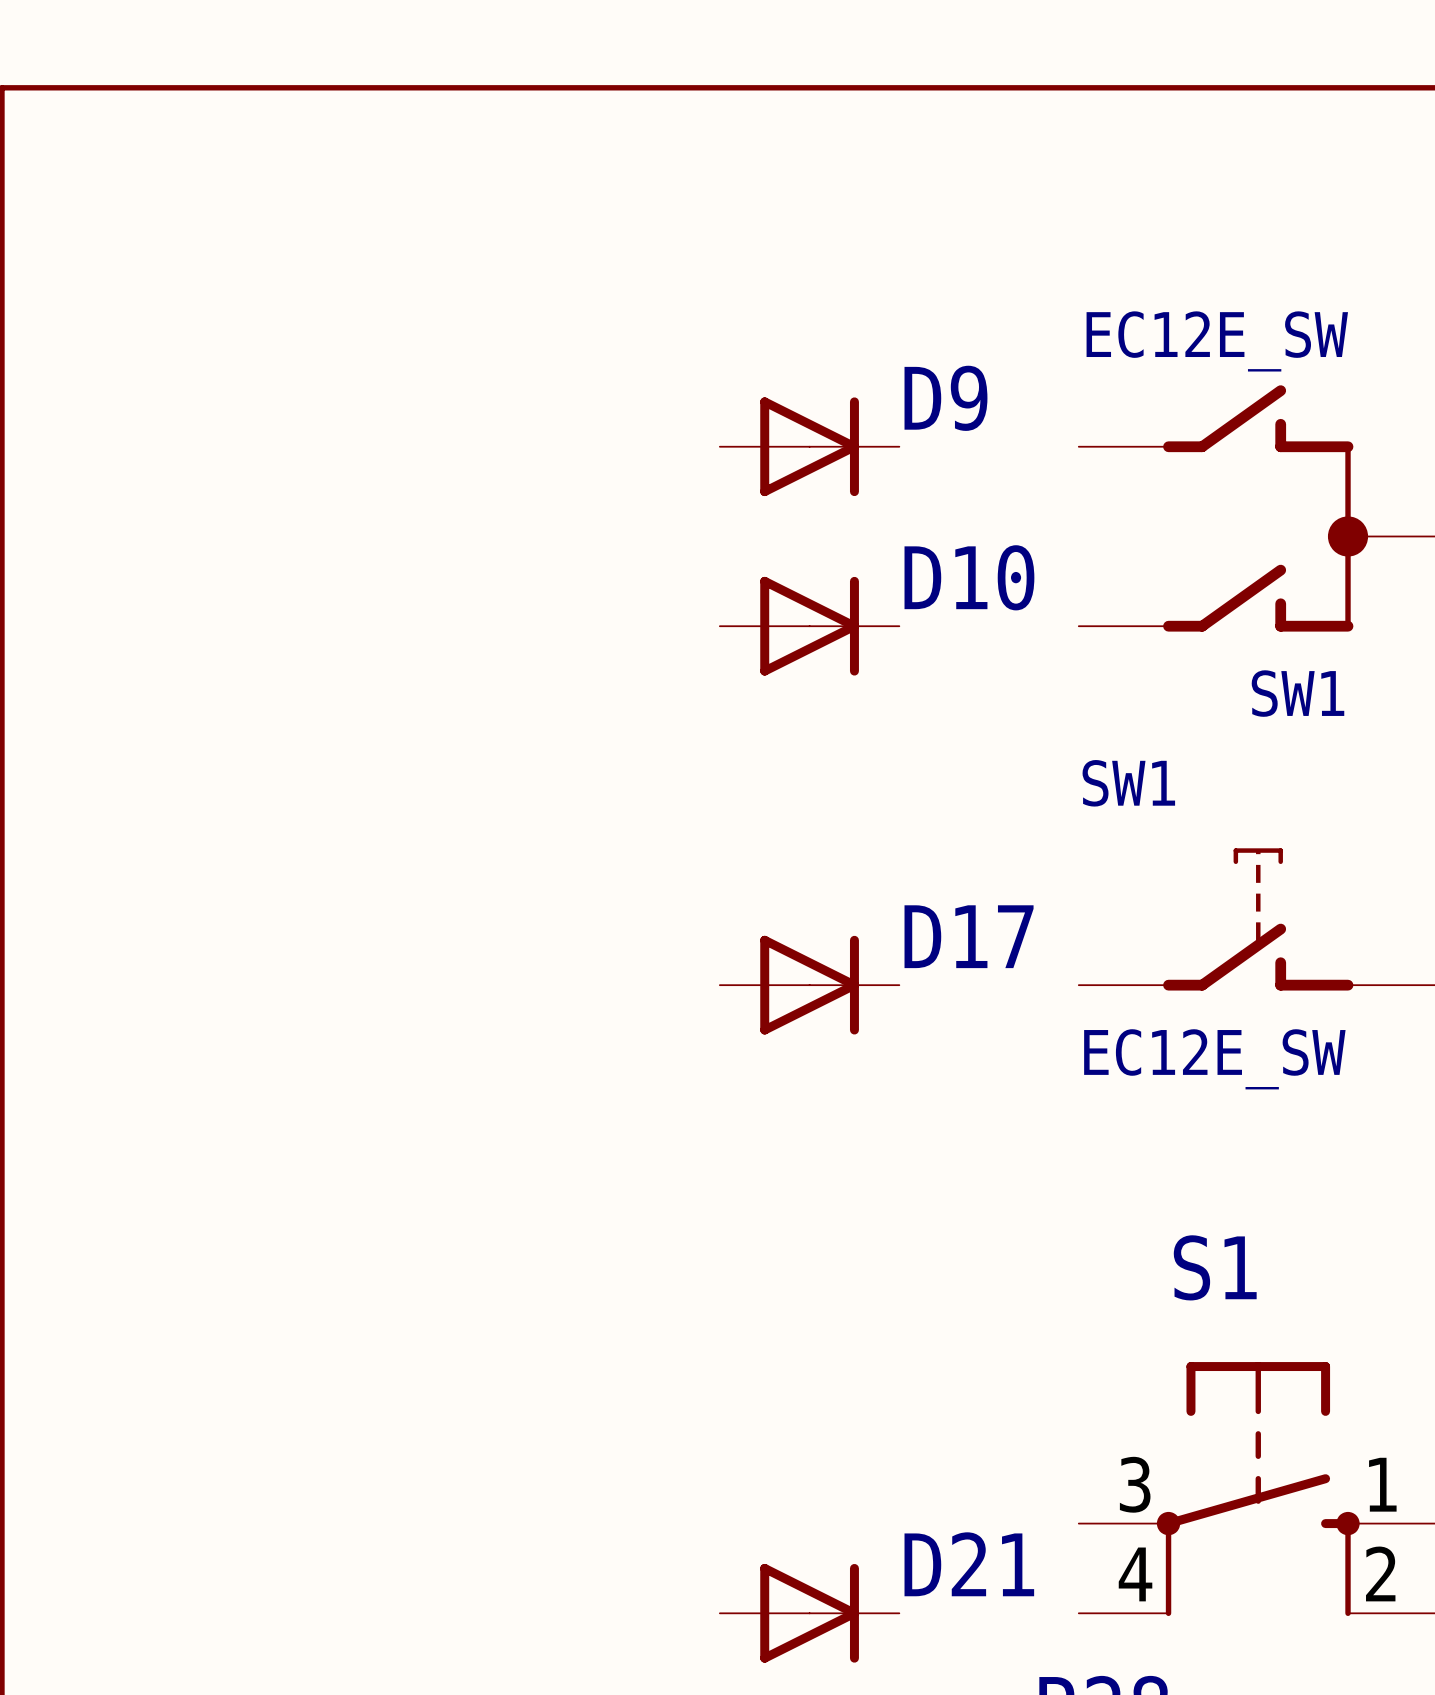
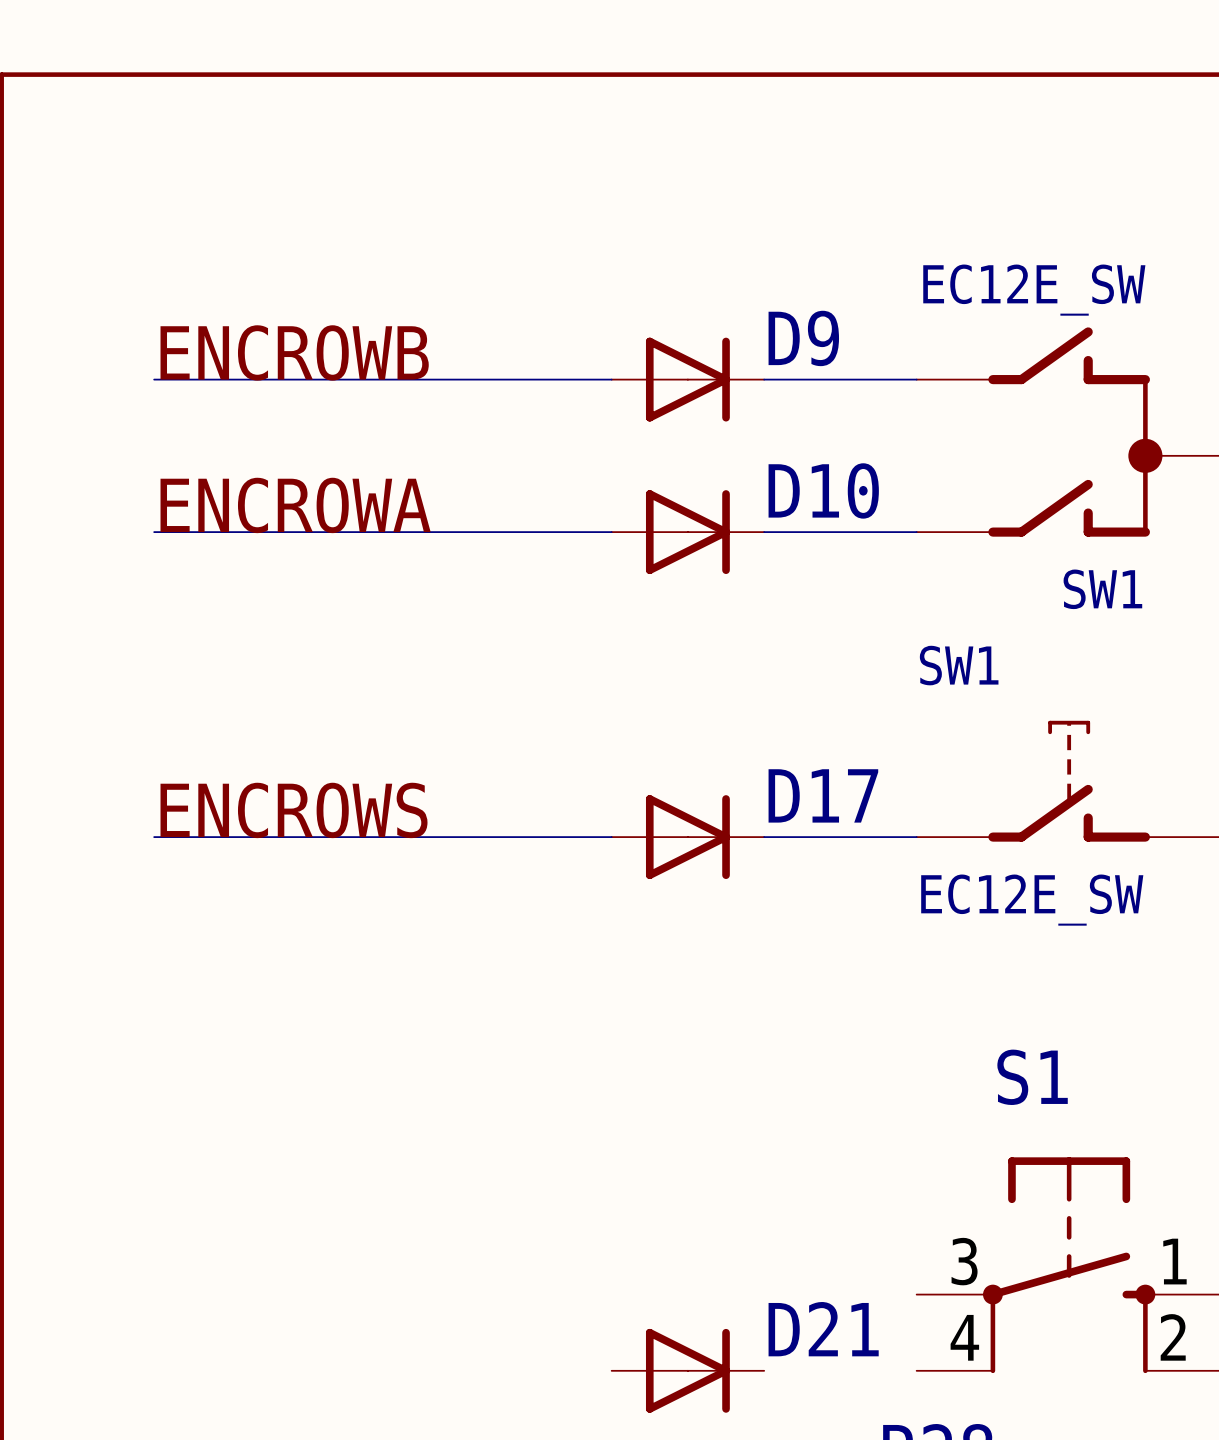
label: none -> ENCROWB (294, 352)
wire: none -> (154, 379) (611, 379)
wire: none -> (764, 379) (916, 379)
label: none -> ENCROWA (295, 505)
wire: none -> (154, 532) (611, 532)
wire: none -> (764, 532) (916, 532)
label: none -> ENCROWS (294, 810)
wire: none -> (154, 837) (611, 837)
wire: none -> (764, 837) (916, 837)

